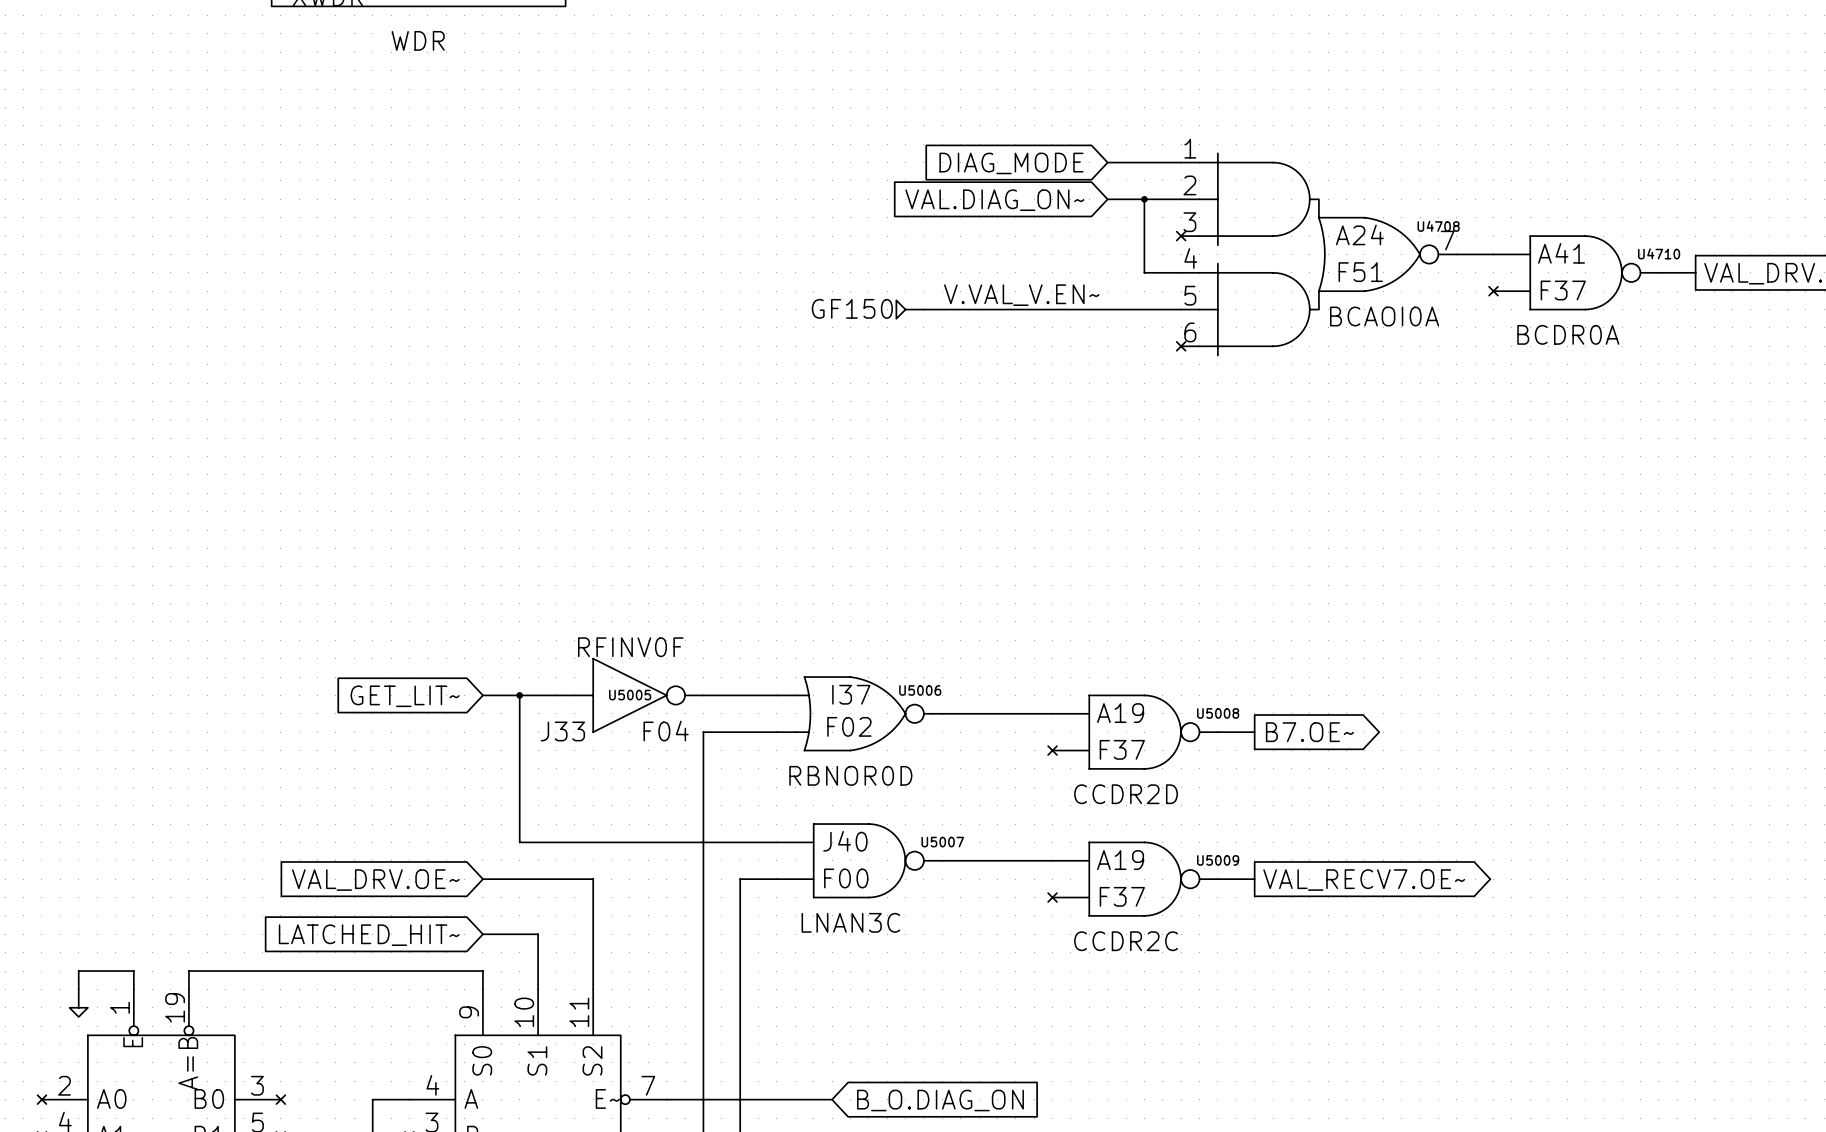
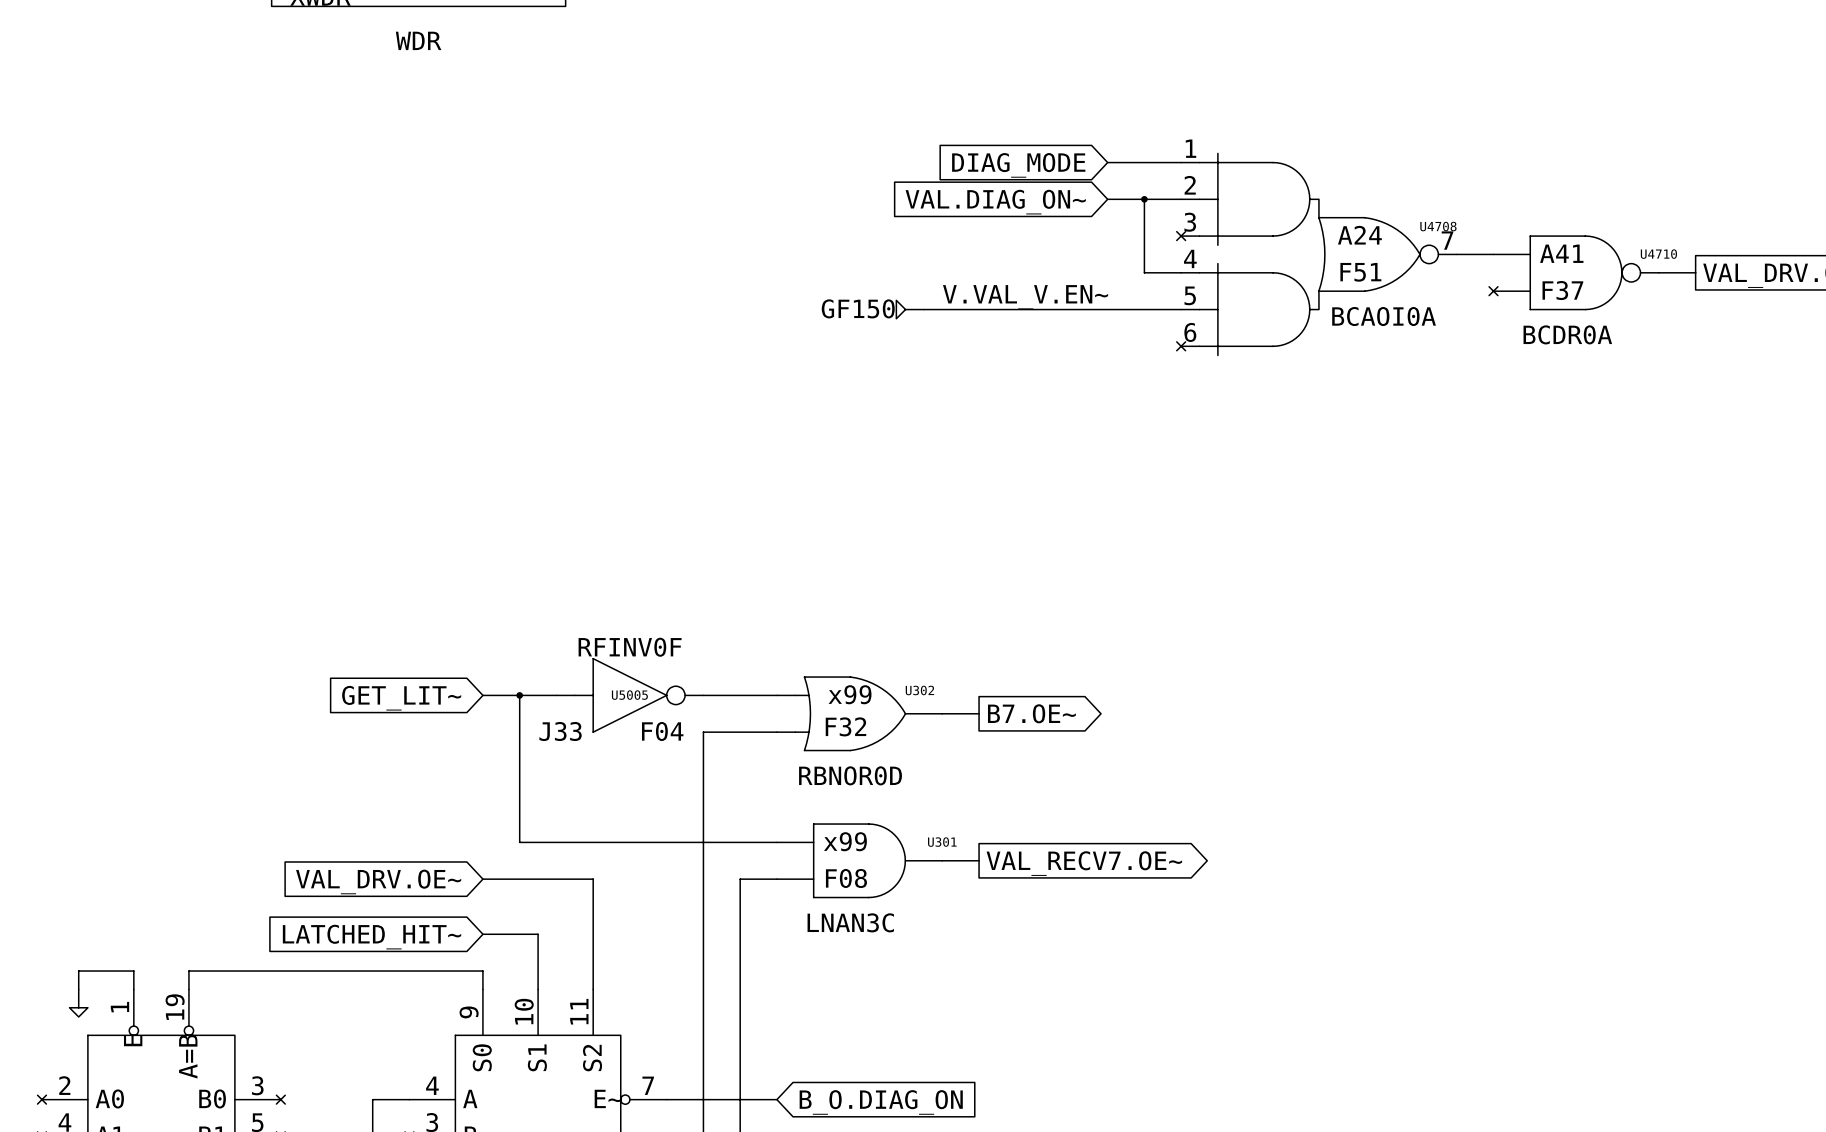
U5006: F02 (859, 713) -> none
U302: none -> F32 (859, 713)
wire: (979, 713) (1052, 713) -> none
global label: none -> B7.OE~ (1031, 713)
U5008: F37 (1135, 732) -> none
wire: (1217, 732) (1254, 732) -> none
global label: B7.OE~ (1309, 732) -> none
no-connect mark: (1052, 750) -> none
U5007: F00 (859, 860) -> none
U301: none -> F08 (859, 860)
wire: (979, 860) (1052, 860) -> none
global label: none -> VAL_RECV7.OE~ (1084, 863)
U5009: F37 (1135, 879) -> none
wire: (1217, 879) (1254, 879) -> none
global label: VAL_RECV7.OE~ (1364, 880) -> none
no-connect mark: (1052, 897) -> none
wire: (776, 1099) (832, 1099) -> none
global label position: B_O.DIAG_ON (940, 1100) -> B_O.DIAG_ON (881, 1102)

